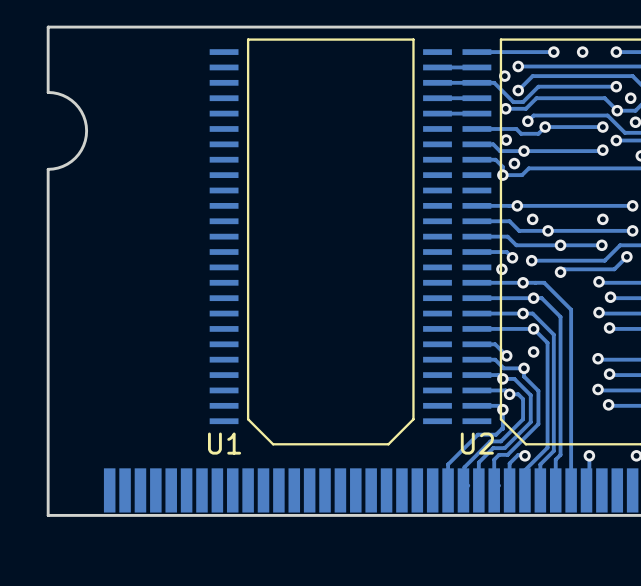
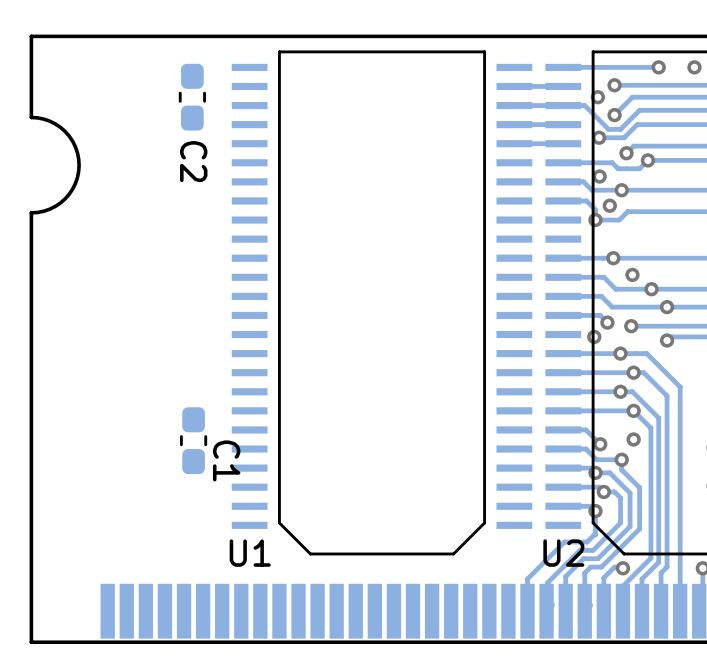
C2: none -> (192, 97)
C1: none -> (193, 440)

